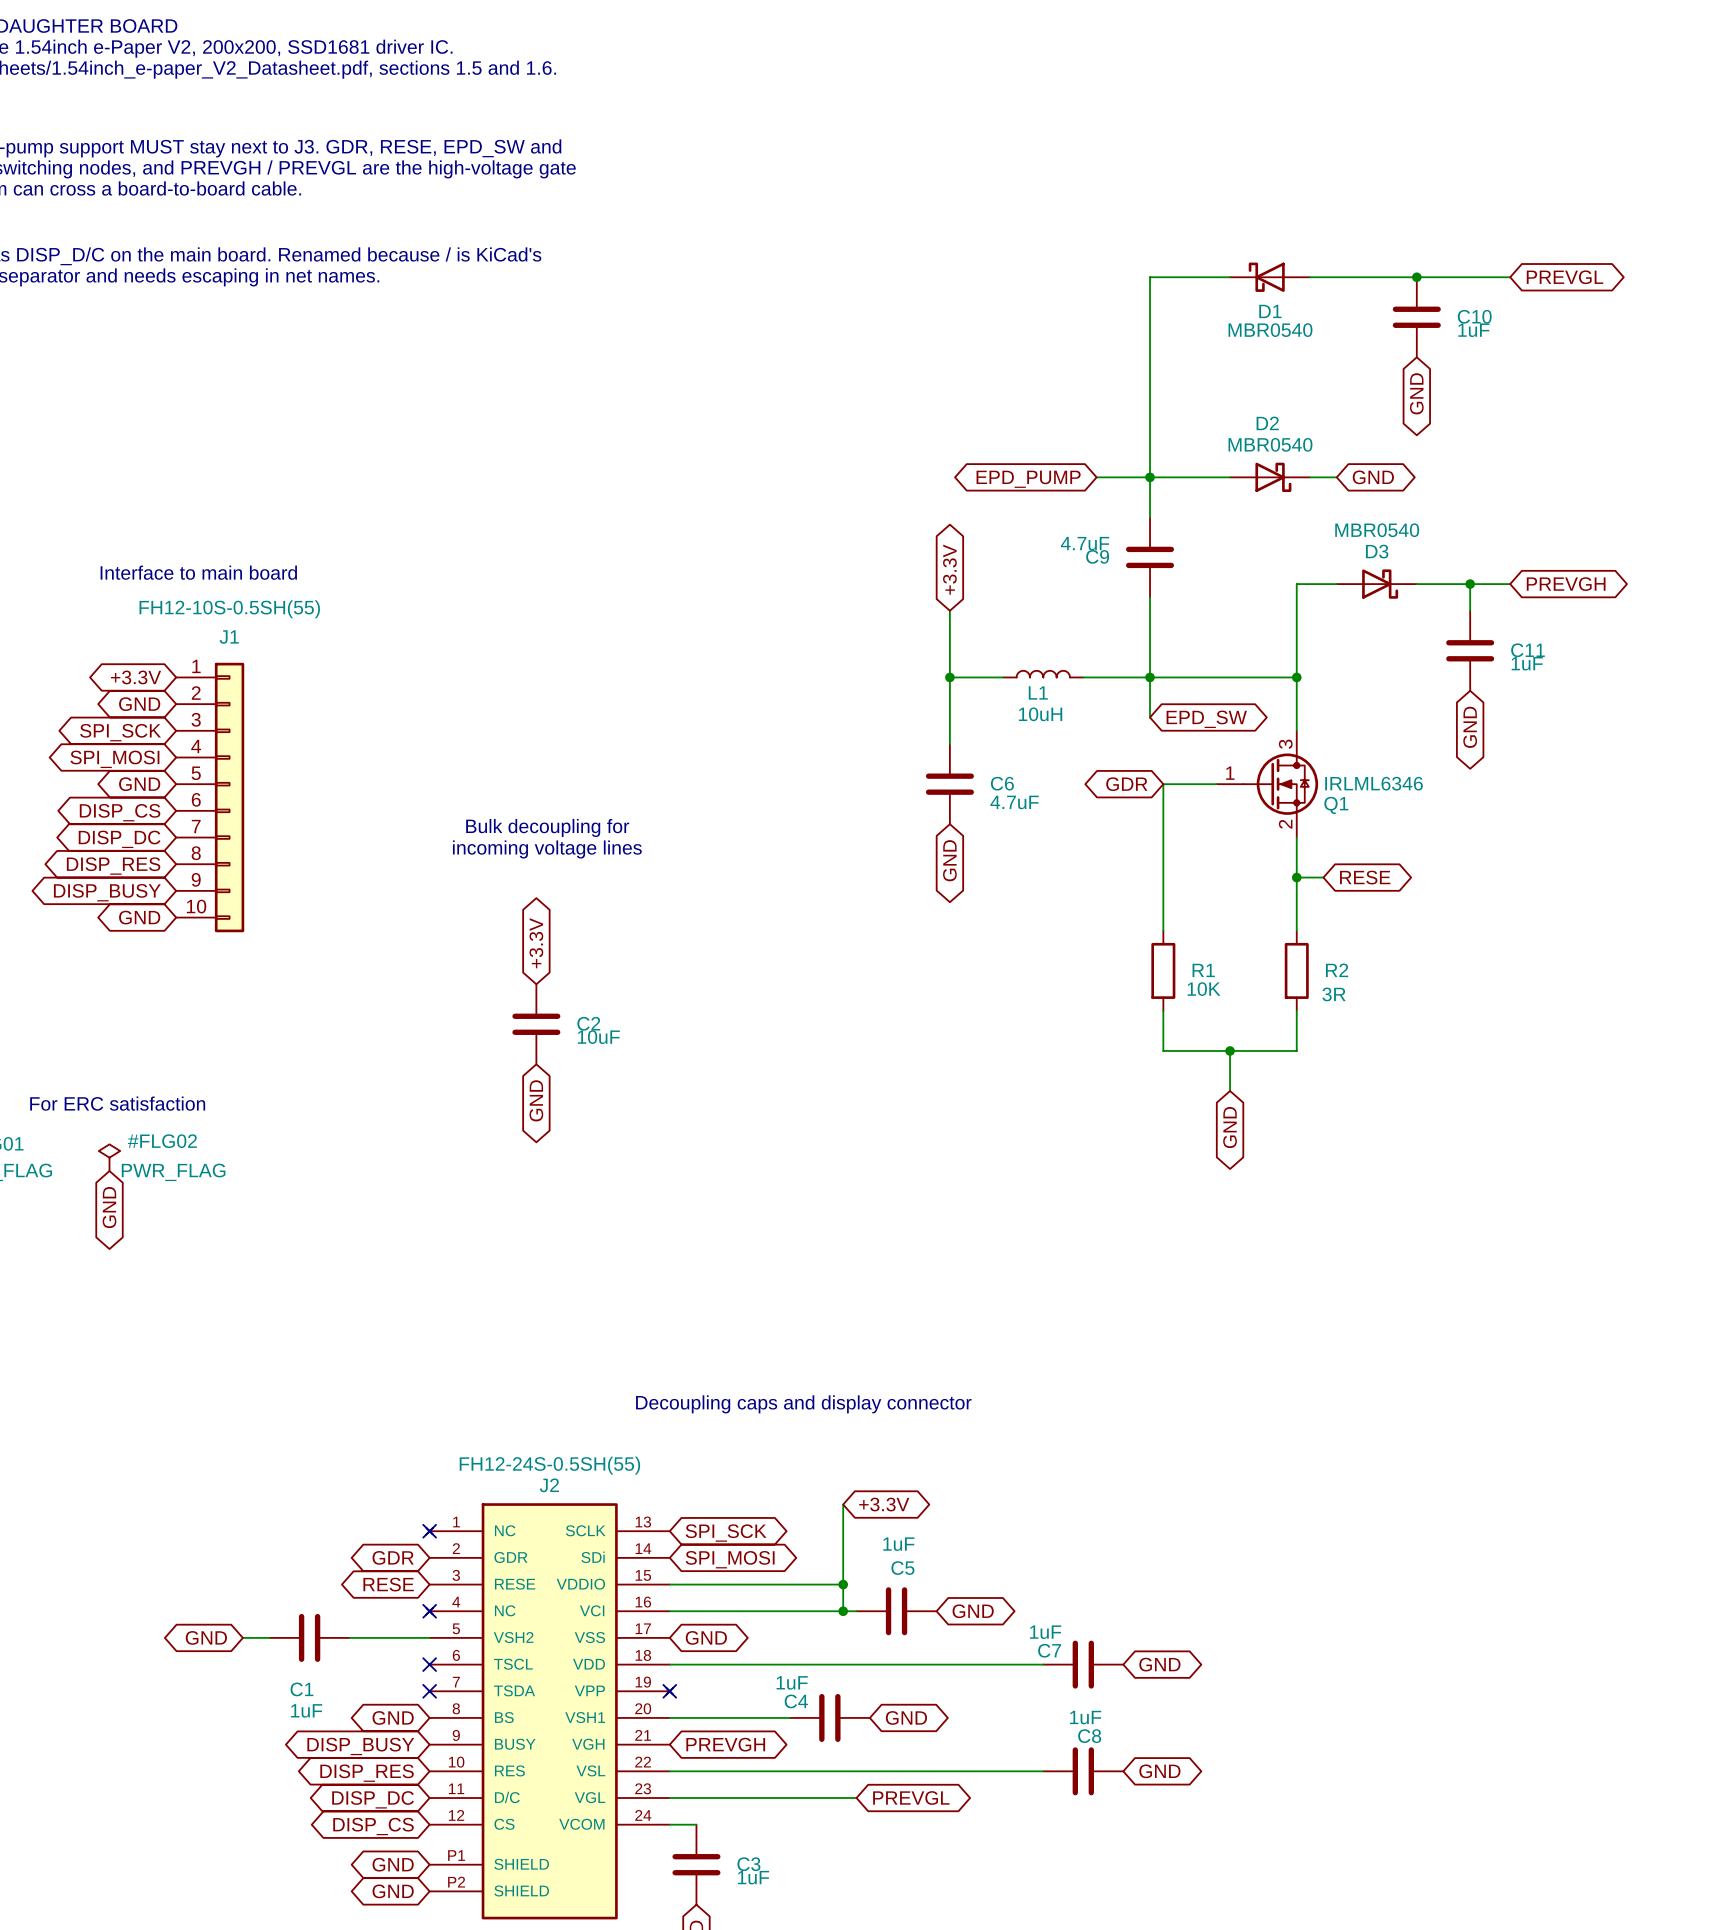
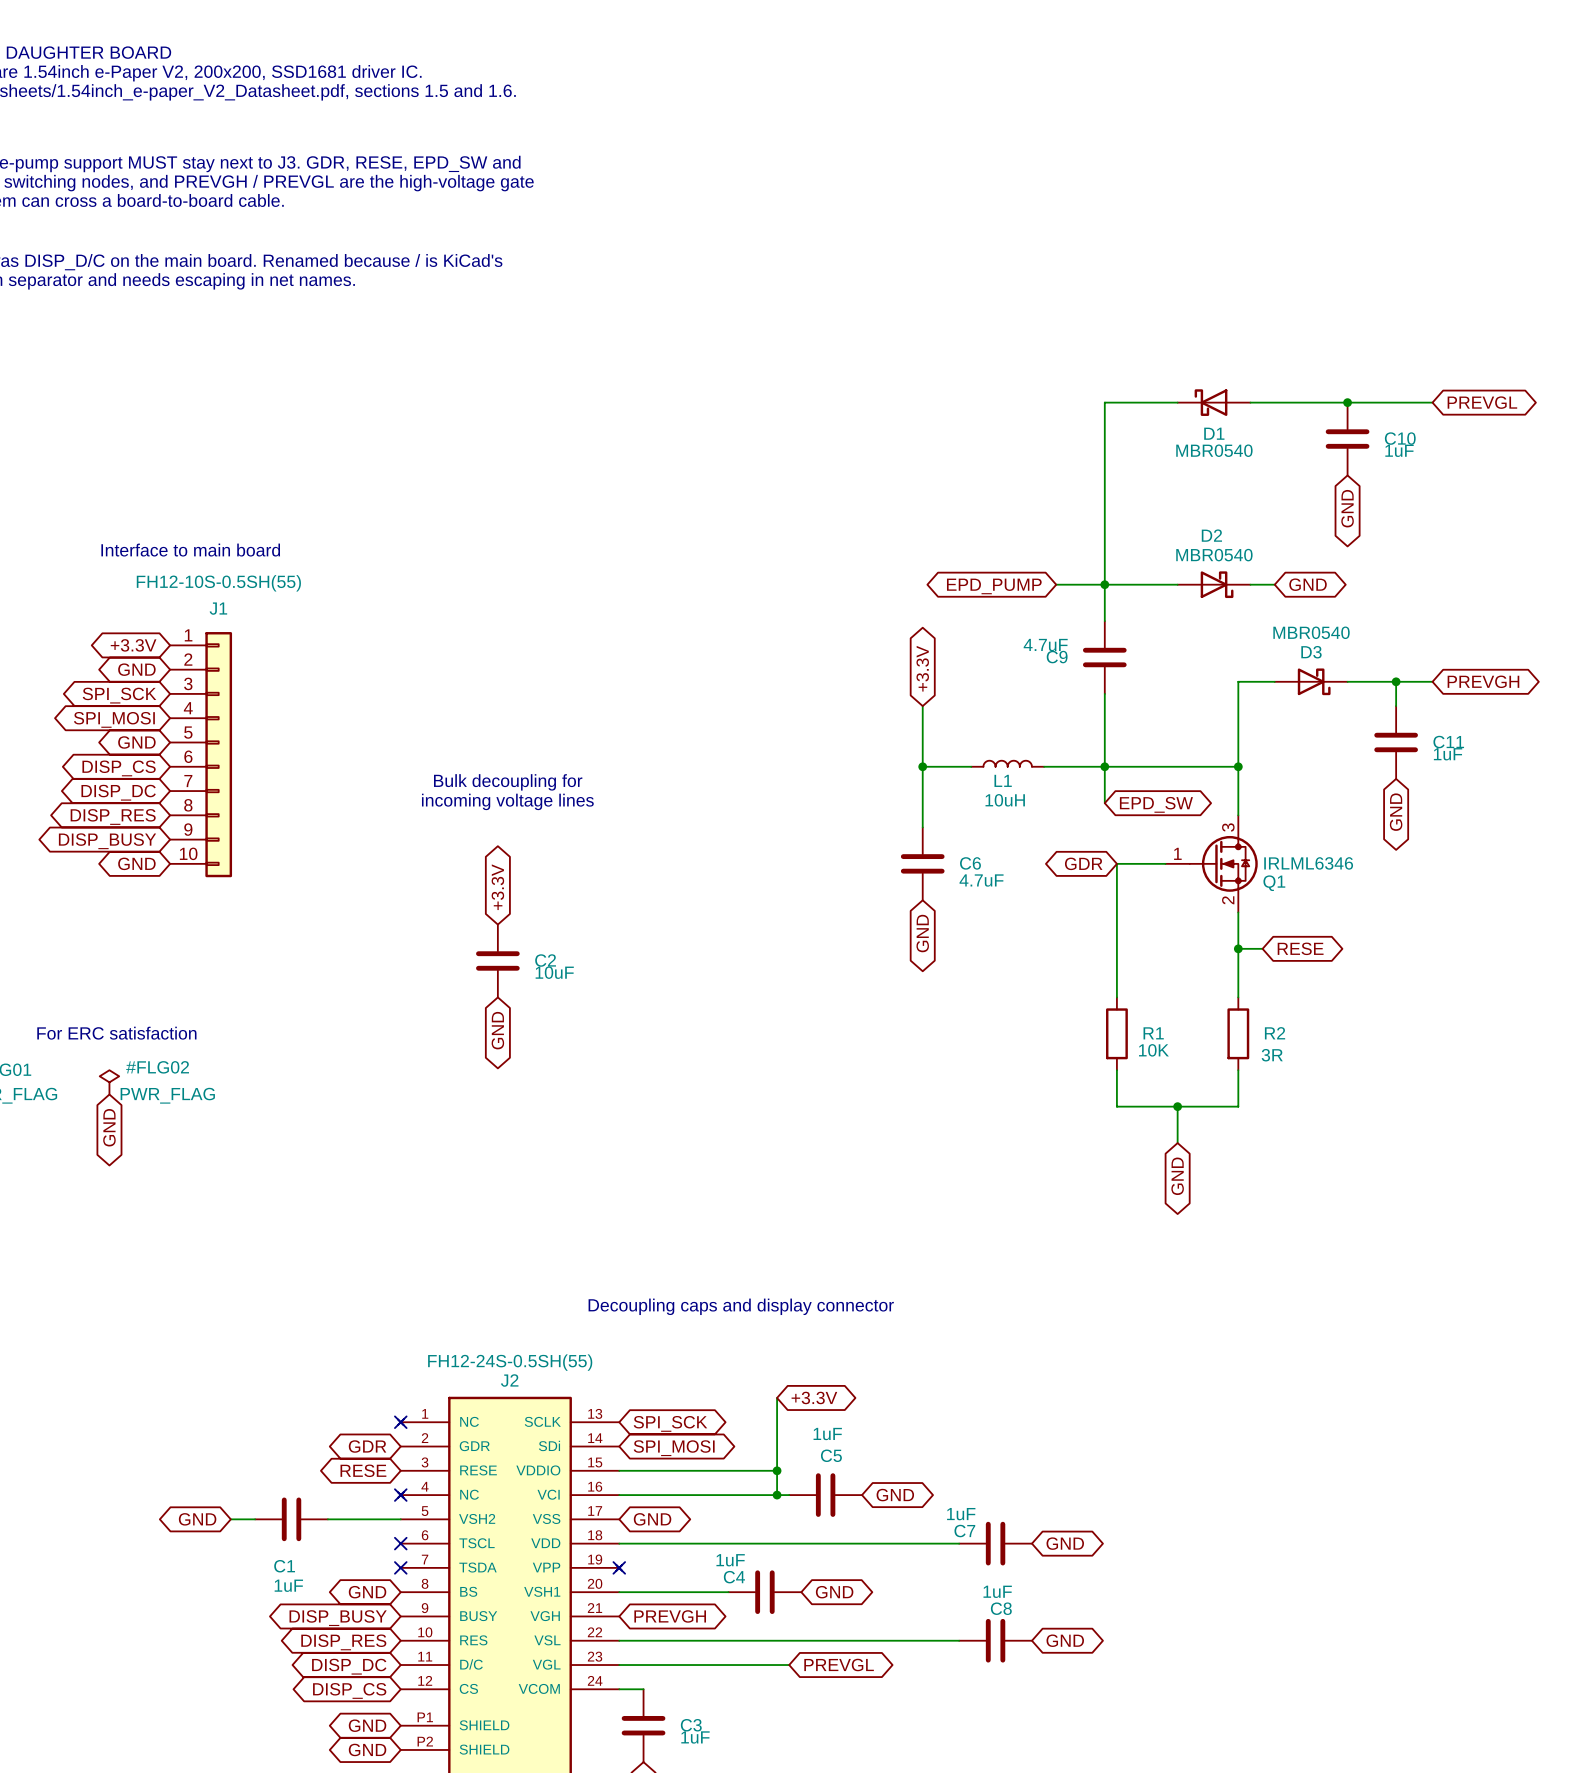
wire: (1230, 277) (1150, 277) (1150, 517) -> (1177, 402) (1104, 402) (1104, 621)
D1 position: (1270, 277) -> (1214, 402)
wire: (1310, 277) (1510, 277) -> (1250, 402) (1432, 402)
junction: (1416, 277) -> none
global label position: PREVGL (1565, 277) -> PREVGL (1482, 402)
C10 position: (1416, 317) -> (1347, 439)
global label: GND (1416, 393) -> none
junction: none -> (1347, 402)
wire: (1096, 477) (1230, 477) -> (1056, 584) (1177, 584)
junction: (1150, 477) -> none
D2 position: (1270, 477) -> (1214, 584)
wire: (1310, 477) (1336, 477) -> (1250, 584) (1274, 584)
global label: GND (1373, 477) -> none
global label position: EPD_PUMP (1028, 479) -> EPD_PUMP (994, 586)
global label: none -> GND (1347, 508)
C9 position: (1150, 557) -> (1104, 657)
global label position: +3.3V (949, 569) -> +3.3V (922, 668)
wire: (1336, 584) (1296, 584) (1296, 730) -> (1274, 681) (1238, 681) (1238, 815)
D3 position: (1376, 584) -> (1311, 681)
wire: (1416, 584) (1510, 584) -> (1347, 681) (1432, 681)
wire: (1470, 584) (1470, 610) -> (1396, 681) (1396, 706)
junction: (1470, 584) -> none
global label position: PREVGH (1566, 584) -> PREVGH (1483, 681)
wire: (1150, 597) (1150, 717) -> (1104, 693) (1104, 803)
wire: (949, 610) (949, 744) -> (922, 706) (922, 827)
junction: none -> (1104, 584)
global label: none -> GND (1308, 584)
C11 position: (1470, 650) -> (1396, 742)
L1 position: (1043, 674) -> (1007, 763)
wire: (949, 677) (1003, 677) -> (922, 766) (971, 766)
junction: (949, 677) -> none
wire: (1083, 677) (1296, 677) -> (1044, 766) (1238, 766)
junction: (1150, 677) -> none
junction: (1296, 677) -> none
junction: none -> (1396, 681)
global label position: EPD_SW (1206, 719) -> EPD_SW (1156, 804)
global label: GND (1470, 727) -> none
C6 position: (949, 784) -> (922, 863)
global label position: GDR (1126, 784) -> GDR (1083, 863)
wire: (1216, 784) (1163, 784) (1163, 930) -> (1165, 863) (1116, 863) (1116, 997)
Q1 position: (1267, 784) -> (1211, 863)
junction: none -> (922, 766)
junction: none -> (1104, 766)
junction: none -> (1238, 766)
wire: (1296, 837) (1296, 930) -> (1238, 912) (1238, 997)
global label: GND (949, 860) -> none
global label: none -> GND (1396, 812)
wire: (1296, 877) (1323, 877) -> (1238, 948) (1262, 948)
junction: (1296, 877) -> none
global label position: RESE (1365, 877) -> RESE (1300, 948)
R1 position: (1163, 970) -> (1116, 1033)
R2 position: (1296, 970) -> (1238, 1033)
global label: none -> GND (922, 933)
wire: (1163, 1010) (1163, 1050) (1296, 1050) (1296, 1010) -> (1116, 1070) (1116, 1106) (1238, 1106) (1238, 1070)
junction: none -> (1238, 948)
wire: (1230, 1050) (1230, 1090) -> (1177, 1106) (1177, 1143)
junction: (1230, 1050) -> none
global label: GND (1230, 1127) -> none
junction: none -> (1177, 1106)
global label: none -> GND (1177, 1176)

